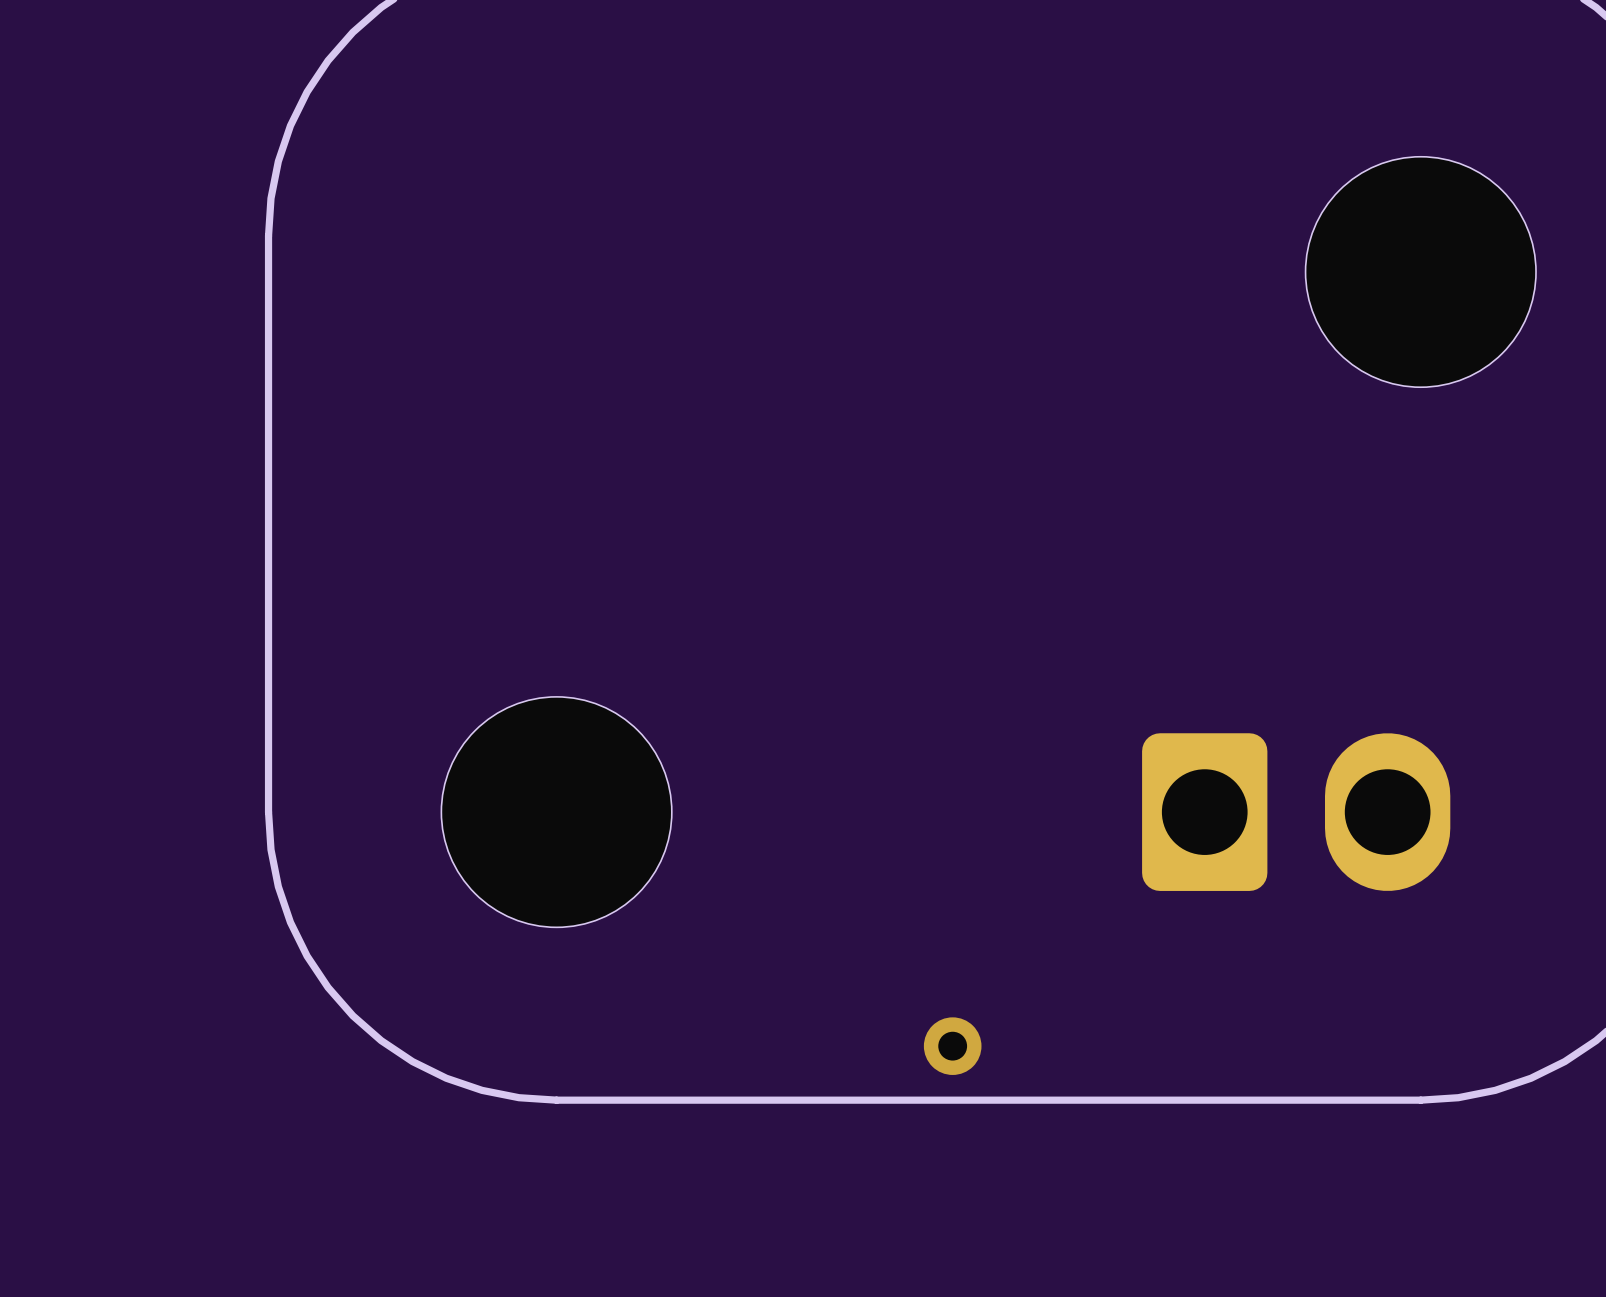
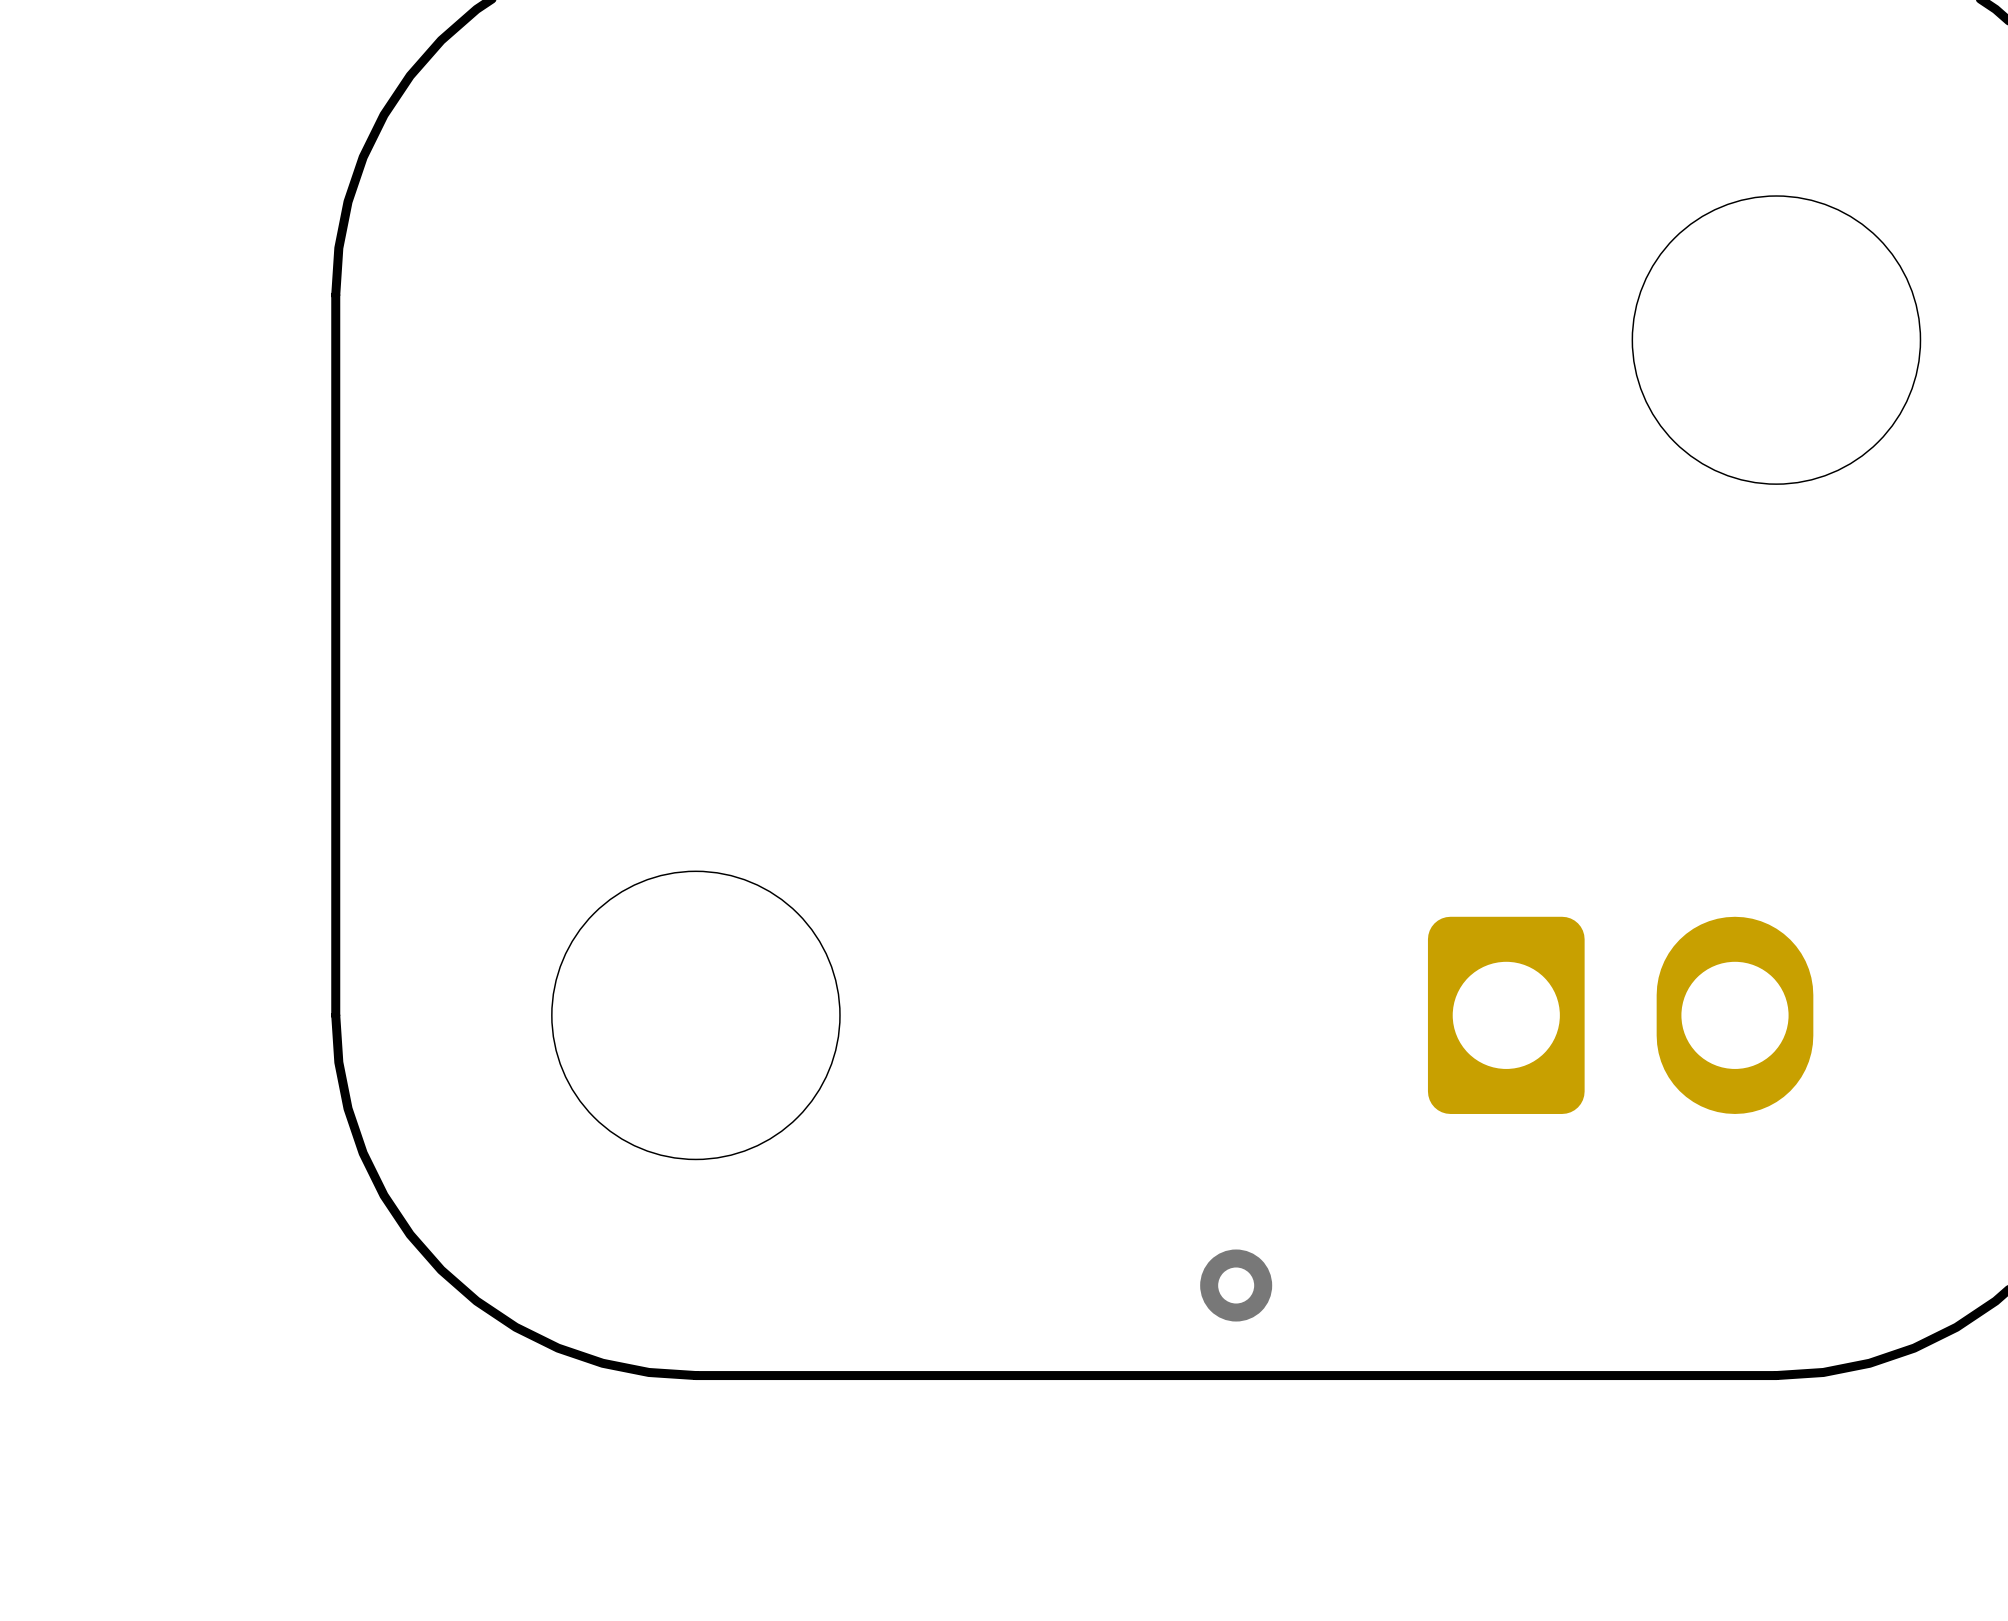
via position: (952, 1046) -> (1236, 1285)

